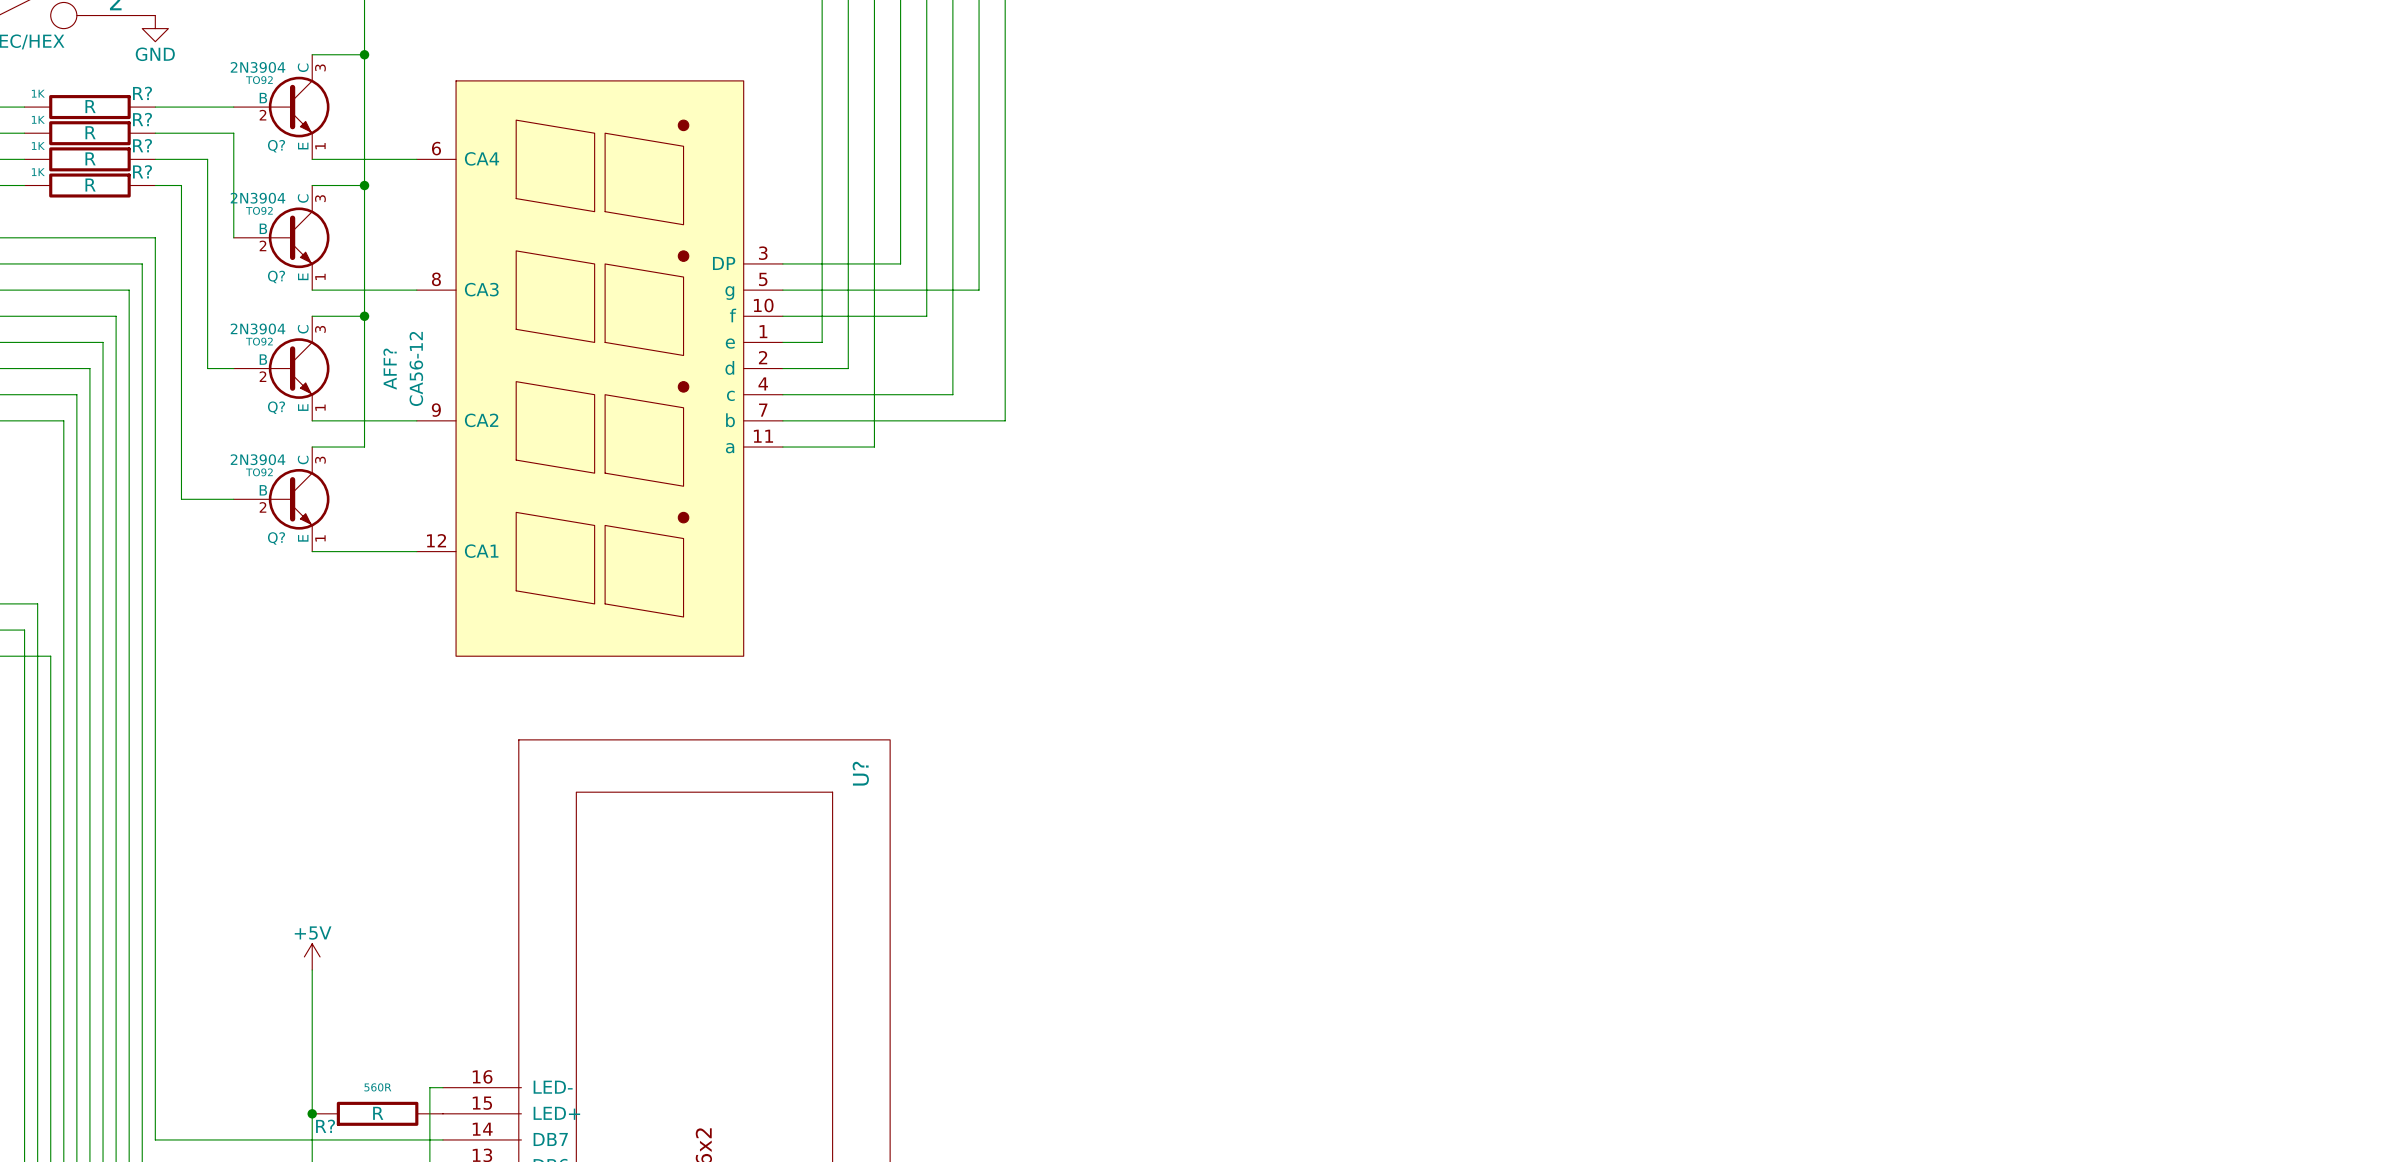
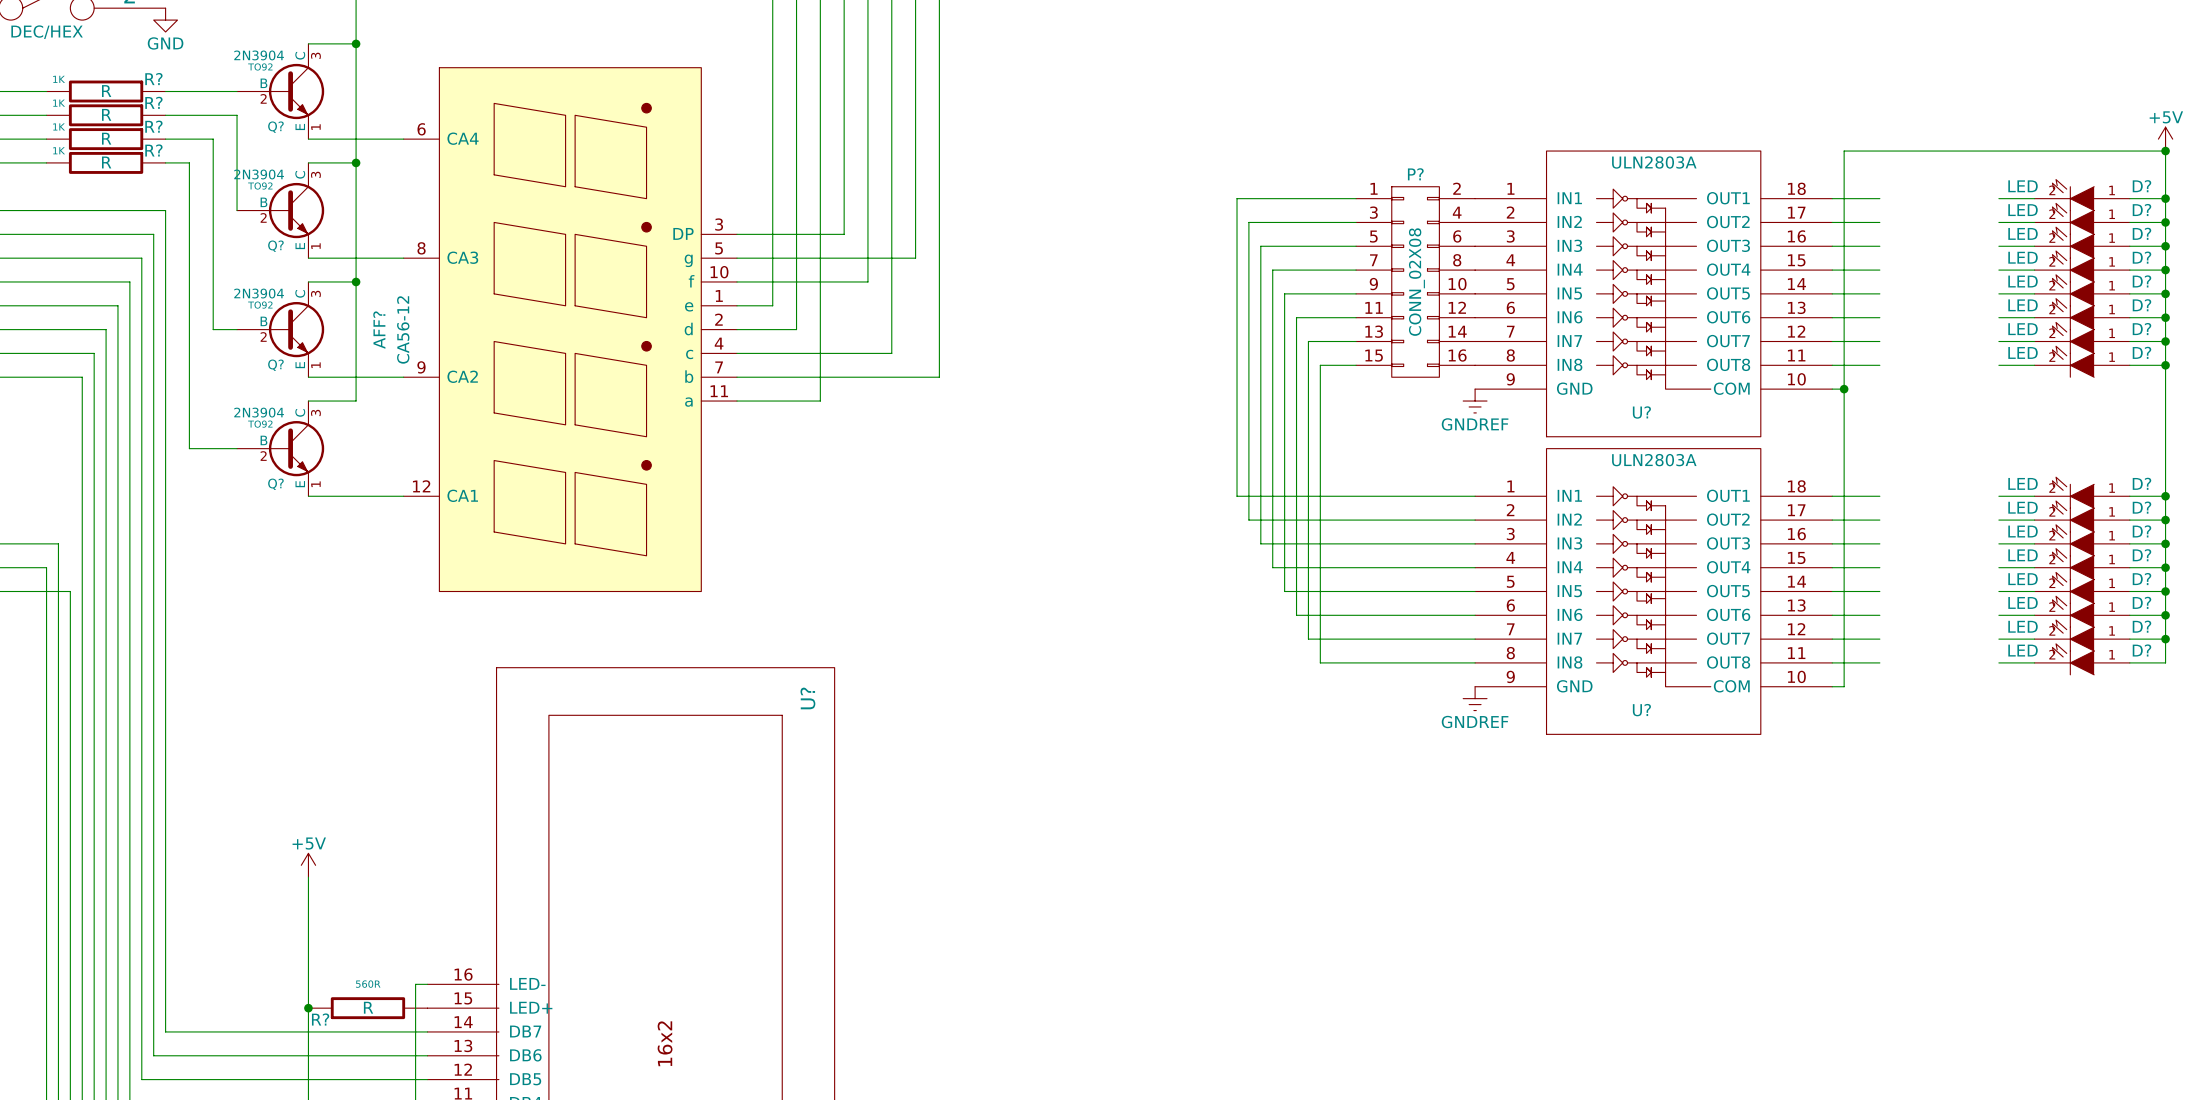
power symbol: none -> +5V (2165, 139)
junction: none -> (2165, 151)
D?: none -> LED (2082, 195)
wire: none -> (1356, 198) (1237, 198) (1237, 496) (1475, 496)
wire: none -> (1832, 198) (1879, 198)
wire: none -> (1998, 198) (2034, 198)
wire: none -> (2129, 198) (2165, 198)
junction: none -> (2165, 198)
D?: none -> LED (2082, 218)
wire: none -> (1356, 222) (1248, 222) (1248, 520) (1475, 520)
wire: none -> (1832, 222) (1879, 222)
wire: none -> (1998, 222) (2034, 222)
wire: none -> (2129, 222) (2165, 222)
junction: none -> (2165, 222)
D?: none -> LED (2082, 242)
wire: none -> (1356, 246) (1260, 246) (1260, 543) (1475, 543)
wire: none -> (1832, 246) (1879, 246)
wire: none -> (1998, 246) (2034, 246)
wire: none -> (2129, 246) (2165, 246)
junction: none -> (2165, 246)
D?: none -> LED (2082, 266)
wire: none -> (1356, 270) (1272, 270) (1272, 567) (1475, 567)
wire: none -> (1832, 270) (1879, 270)
wire: none -> (1998, 270) (2034, 270)
wire: none -> (2129, 270) (2165, 270)
junction: none -> (2165, 270)
P?: none -> CONN_02X08 (1415, 281)
D?: none -> LED (2082, 290)
wire: none -> (1356, 293) (1284, 293) (1284, 591) (1475, 591)
U?: none -> ULN2803A (1653, 293)
wire: none -> (1832, 293) (1879, 293)
wire: none -> (1998, 293) (2034, 293)
wire: none -> (2129, 293) (2165, 293)
junction: none -> (2165, 293)
D?: none -> LED (2082, 314)
wire: none -> (1356, 317) (1296, 317) (1296, 615) (1475, 615)
wire: none -> (1832, 317) (1879, 317)
wire: none -> (1998, 317) (2034, 317)
wire: none -> (2129, 317) (2165, 317)
junction: none -> (2165, 317)
D?: none -> LED (2082, 337)
wire: none -> (1356, 341) (1308, 341) (1308, 639) (1475, 639)
wire: none -> (1832, 341) (1879, 341)
wire: none -> (1998, 341) (2034, 341)
wire: none -> (2129, 341) (2165, 341)
junction: none -> (2165, 341)
D?: none -> LED (2082, 361)
wire: none -> (1356, 365) (1320, 365) (1320, 662) (1475, 662)
wire: none -> (1832, 365) (1879, 365)
wire: none -> (1998, 365) (2034, 365)
wire: none -> (2129, 365) (2165, 365)
junction: none -> (2165, 365)
wire: none -> (1832, 389) (1844, 389)
junction: none -> (1844, 389)
power symbol: none -> GNDREF (1475, 401)
D?: none -> LED (2082, 492)
wire: none -> (1832, 496) (1879, 496)
wire: none -> (1998, 496) (2034, 496)
wire: none -> (2129, 496) (2165, 496)
junction: none -> (2165, 496)
D?: none -> LED (2082, 516)
wire: none -> (1832, 520) (1879, 520)
wire: none -> (1998, 520) (2034, 520)
wire: none -> (2129, 520) (2165, 520)
junction: none -> (2165, 520)
D?: none -> LED (2082, 540)
wire: none -> (1832, 543) (1879, 543)
wire: none -> (1998, 543) (2034, 543)
wire: none -> (2129, 543) (2165, 543)
junction: none -> (2165, 543)
D?: none -> LED (2082, 564)
wire: none -> (1832, 567) (1879, 567)
wire: none -> (1998, 567) (2034, 567)
wire: none -> (2129, 567) (2165, 567)
junction: none -> (2165, 567)
D?: none -> LED (2082, 587)
U?: none -> ULN2803A (1653, 591)
wire: none -> (1832, 591) (1879, 591)
wire: none -> (1998, 591) (2034, 591)
wire: none -> (2129, 591) (2165, 591)
junction: none -> (2165, 591)
D?: none -> LED (2082, 611)
wire: none -> (1832, 615) (1879, 615)
wire: none -> (1998, 615) (2034, 615)
wire: none -> (2129, 615) (2165, 615)
junction: none -> (2165, 615)
D?: none -> LED (2082, 635)
wire: none -> (1832, 639) (1879, 639)
wire: none -> (1998, 639) (2034, 639)
wire: none -> (2129, 639) (2165, 639)
junction: none -> (2165, 639)
D?: none -> LED (2082, 659)
wire: none -> (1832, 662) (1879, 662)
wire: none -> (1998, 662) (2034, 662)
wire: none -> (2129, 662) (2165, 662) (2165, 151) (1844, 151) (1844, 686) (1832, 686)
power symbol: none -> GNDREF (1475, 698)

